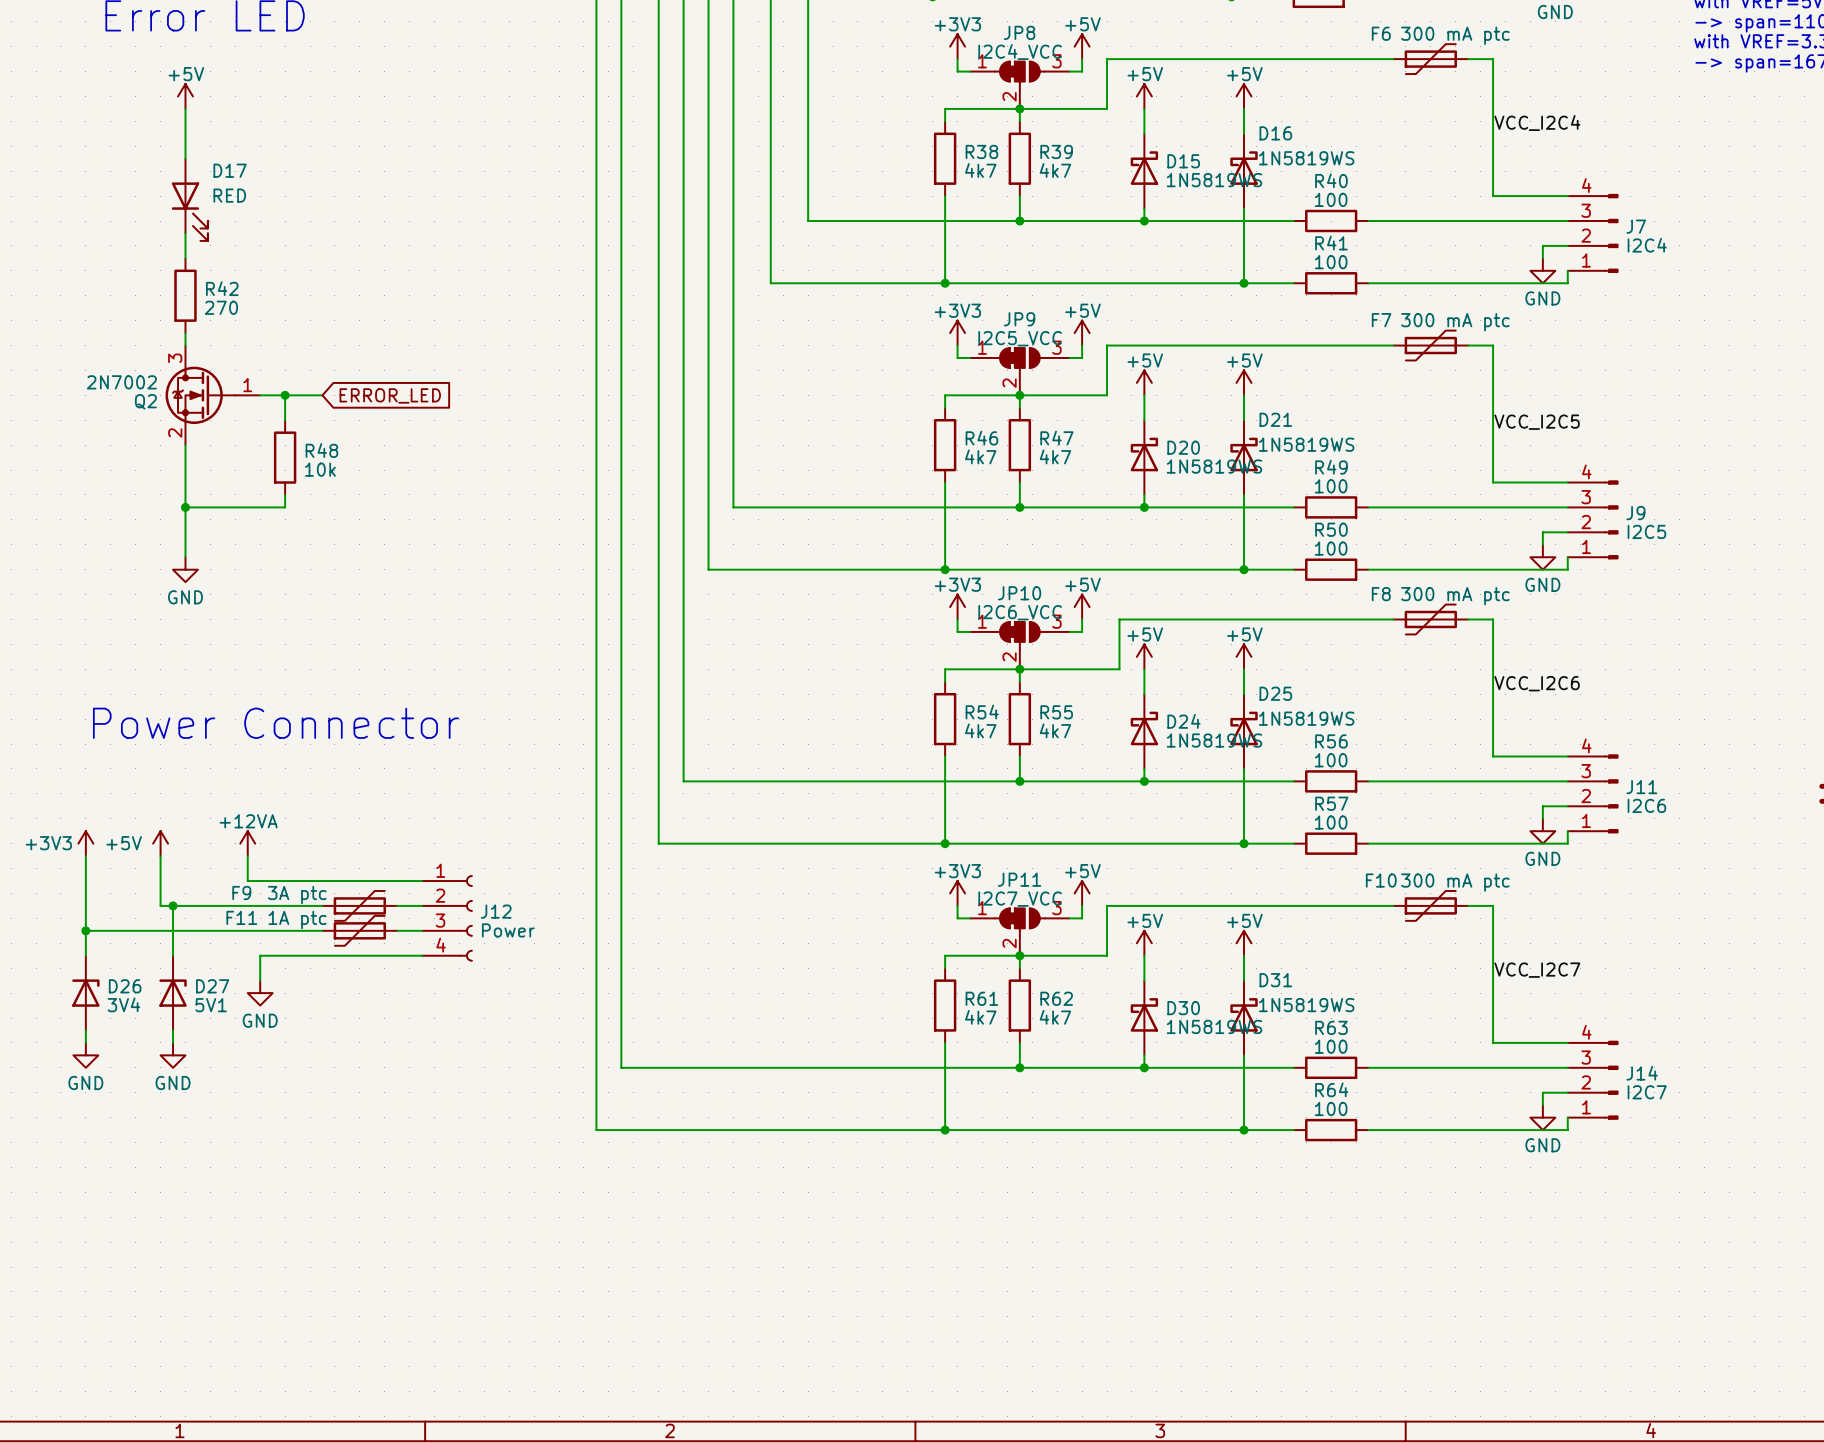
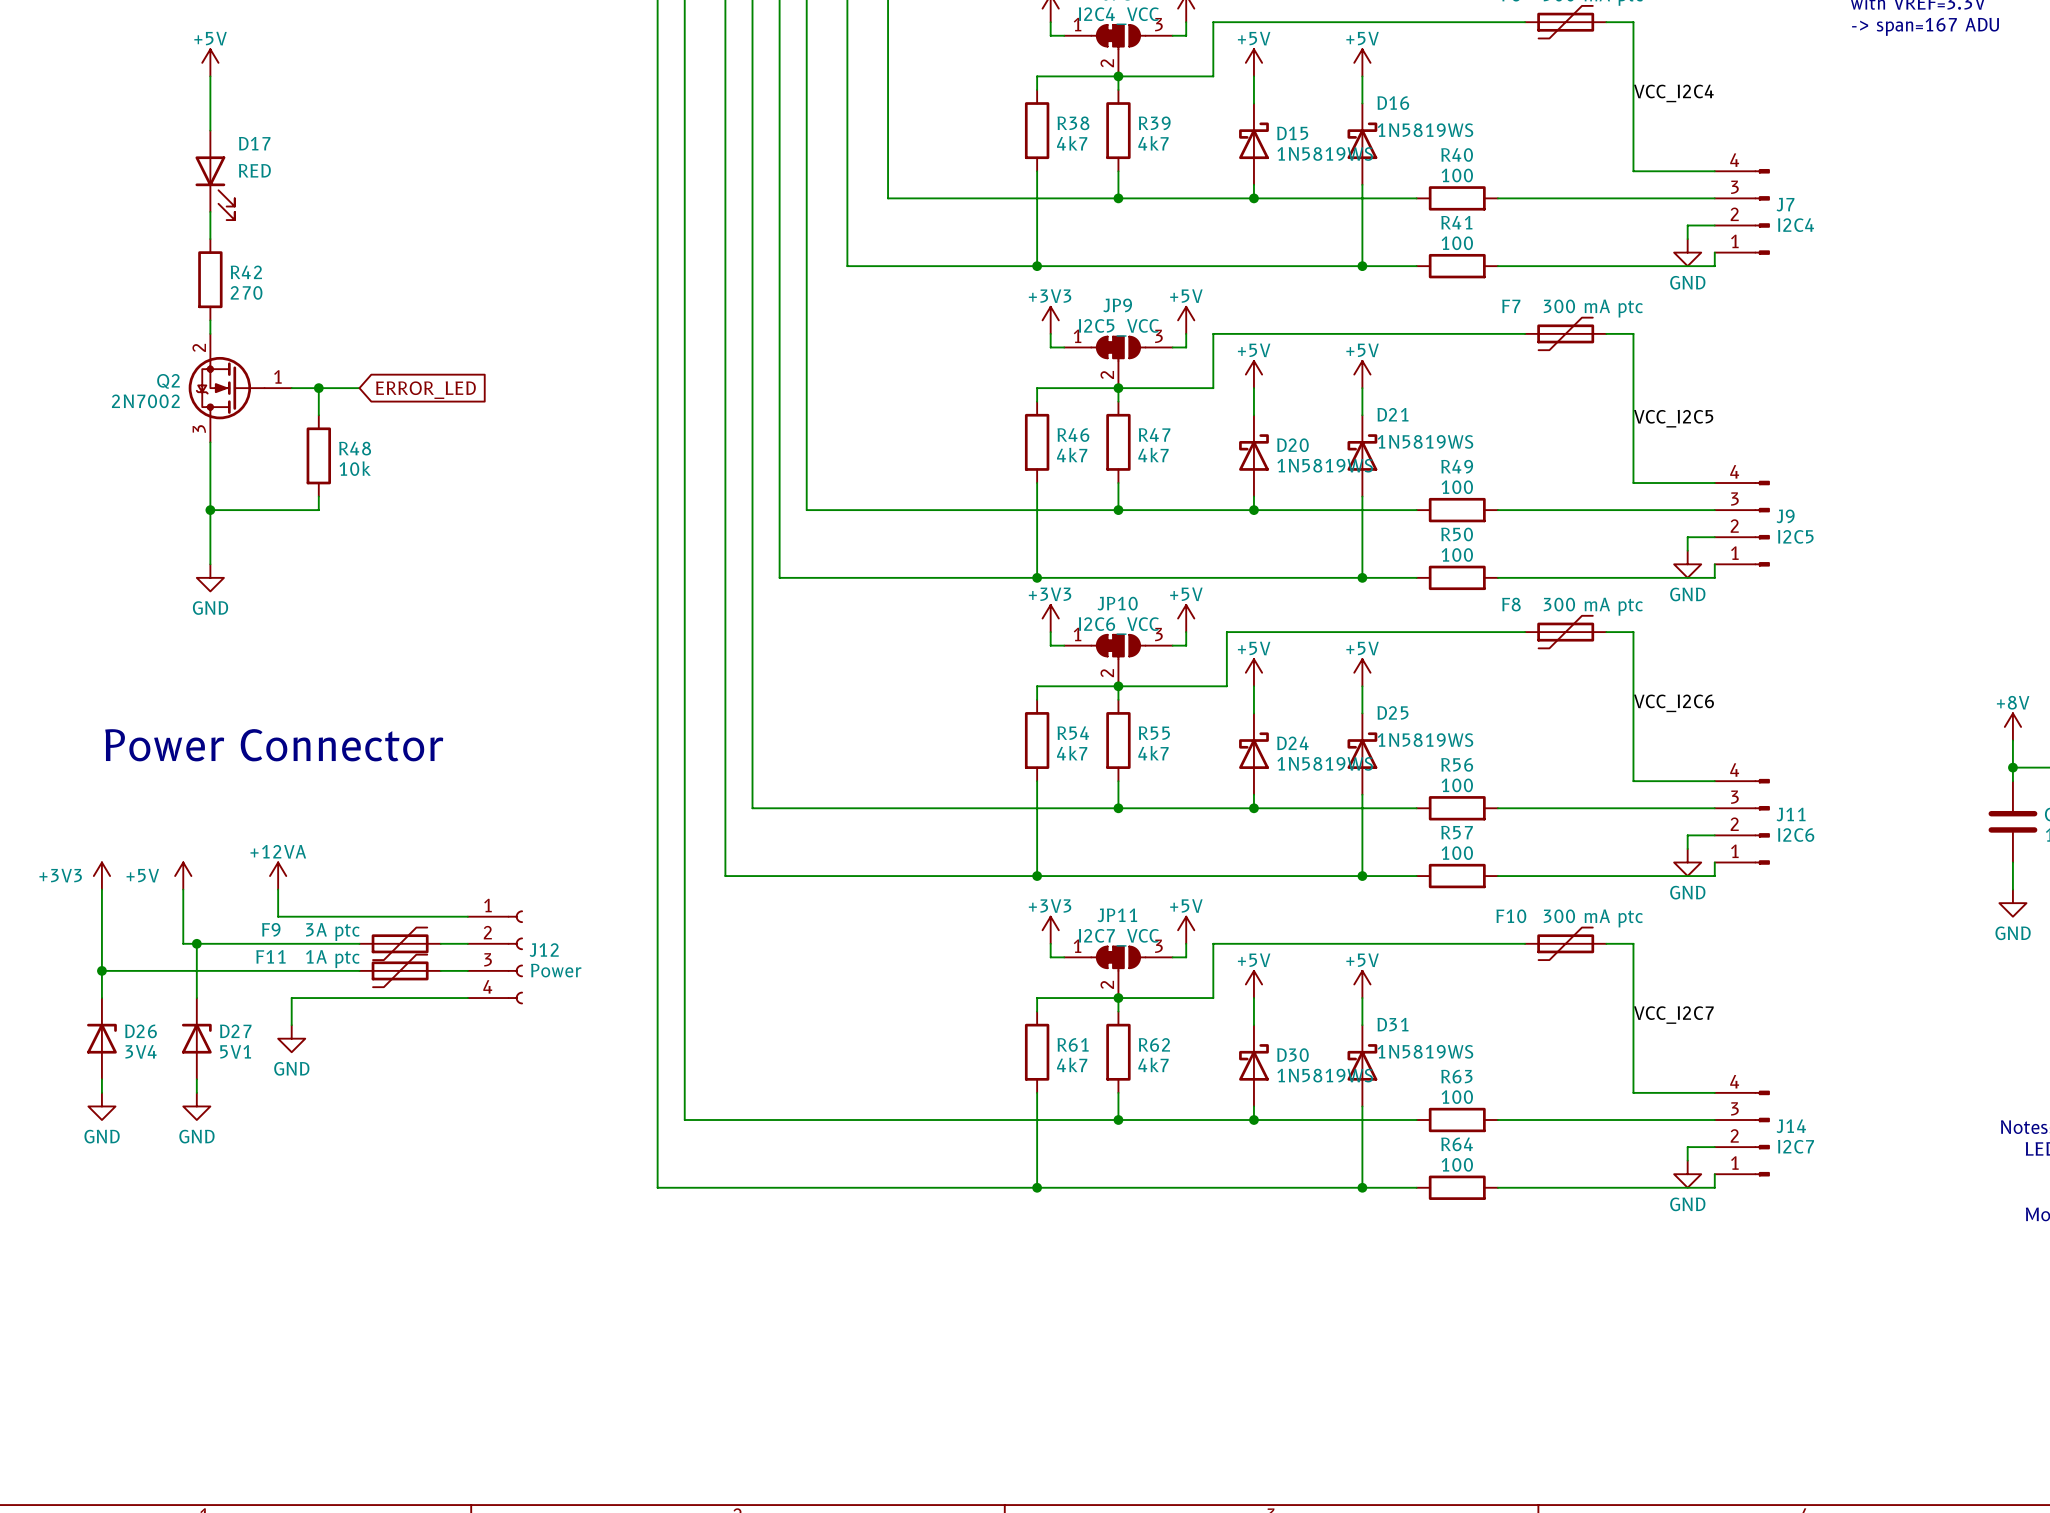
Q2 flip: as is (200, 395) -> up-down (226, 388)

